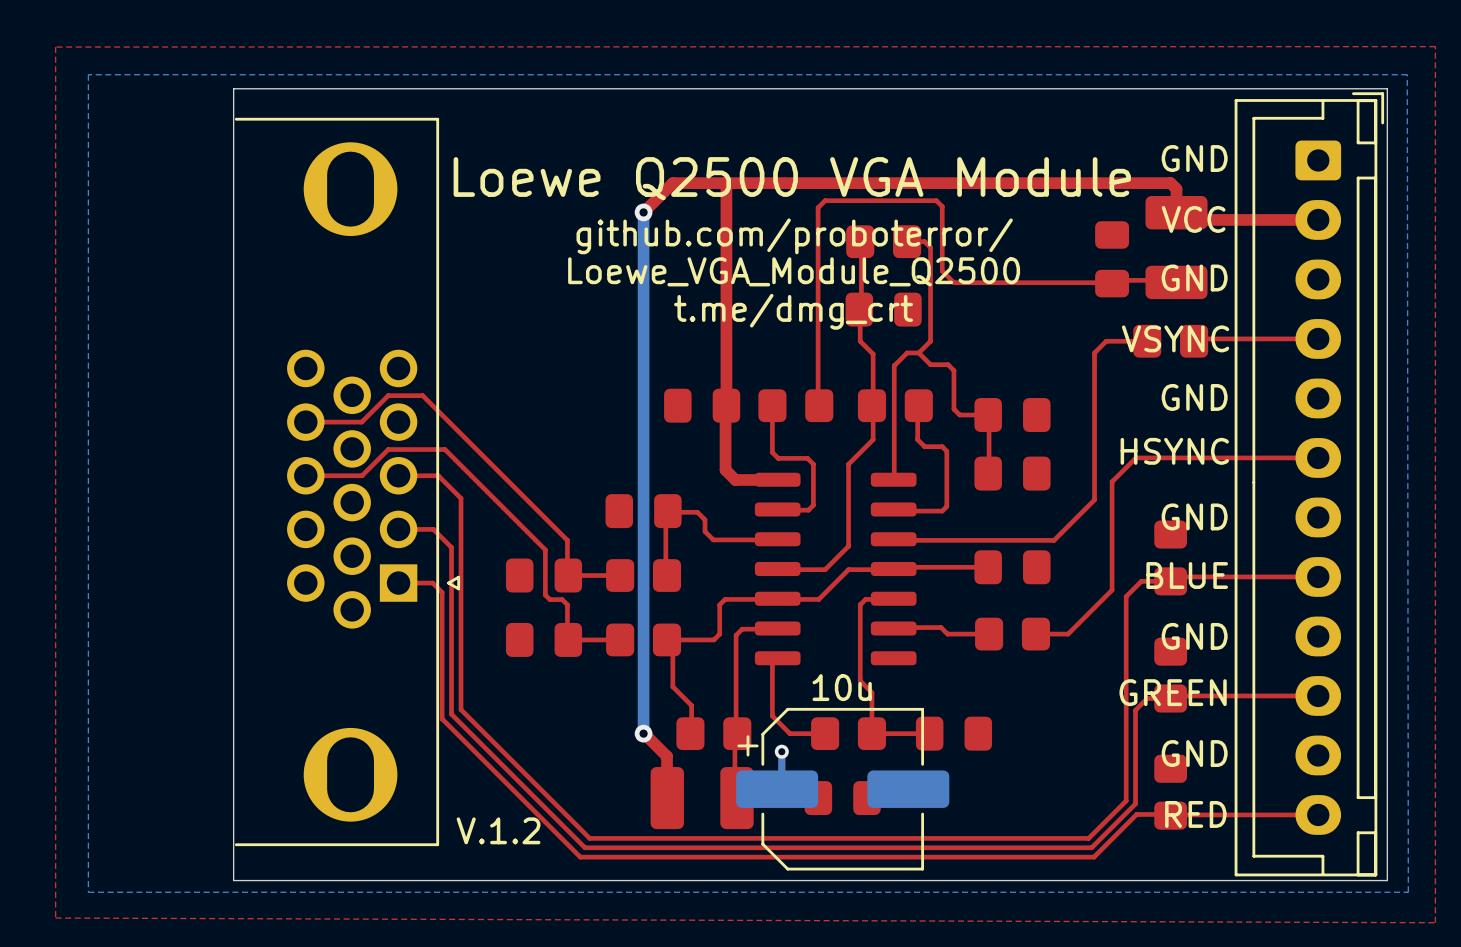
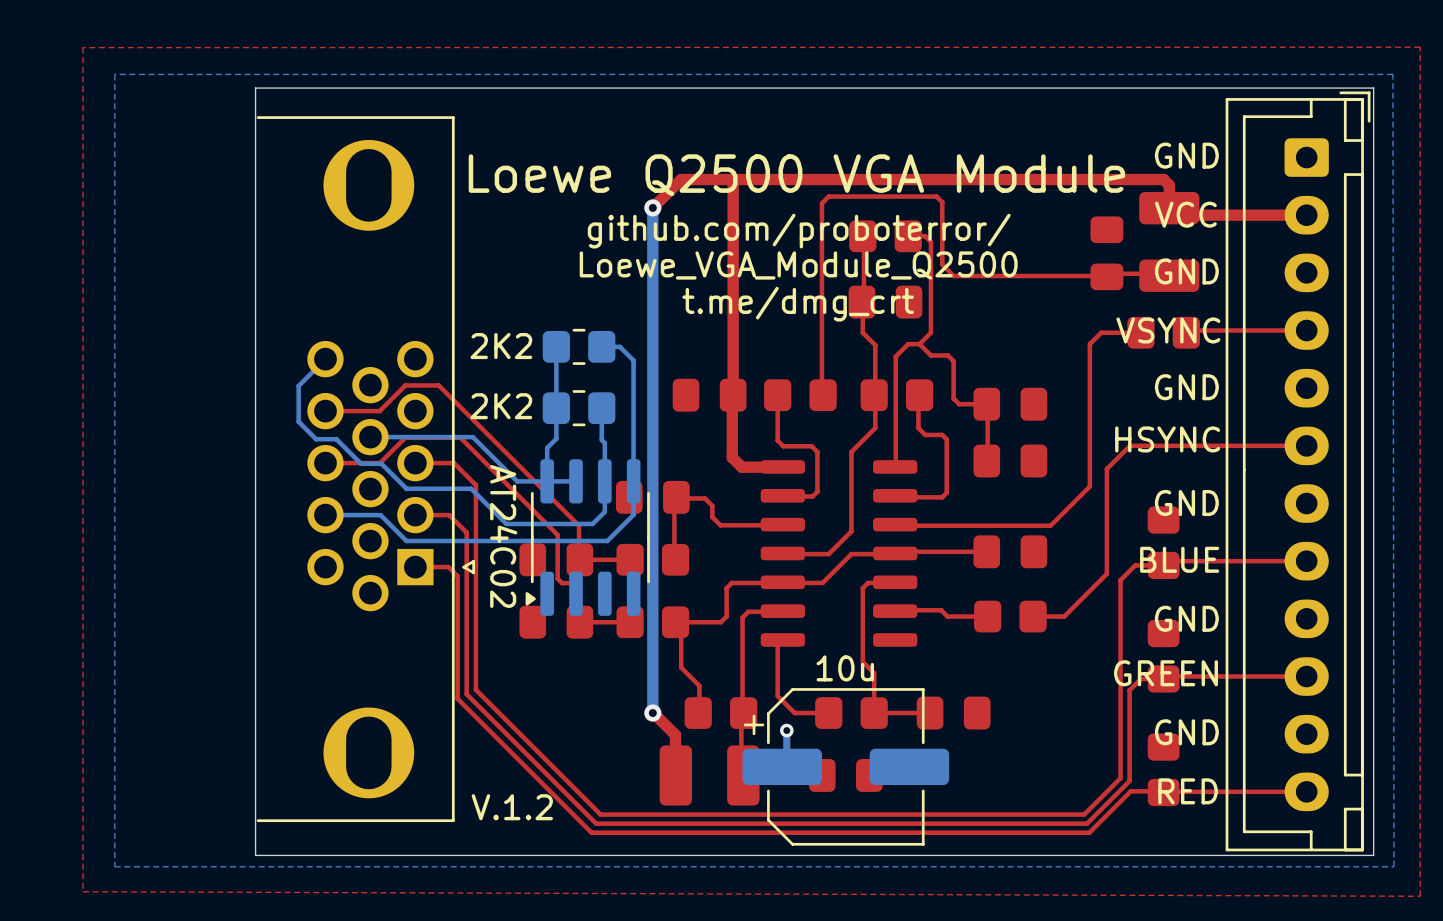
bottom track: none -> (556, 346) (556, 438) (547, 448) (547, 481)
part: none -> 2K2 (579, 346)
bottom track: none -> (601, 346) (619, 346) (633, 360) (633, 481)
bottom track: none -> (325, 359) (298, 385) (298, 421) (316, 439) (336, 439) (361, 463) (381, 463) (406, 488) (471, 488) (506, 523) (592, 523) (604, 511) (604, 443) (601, 439) (601, 408)
part: none -> 2K2 (579, 408)
bottom track: none -> (370, 437) (472, 437) (517, 481) (576, 481)
bottom track: none -> (633, 481) (633, 514) (607, 540) (406, 540) (380, 515) (325, 515)
part: none -> AT24C02 (587, 537)

